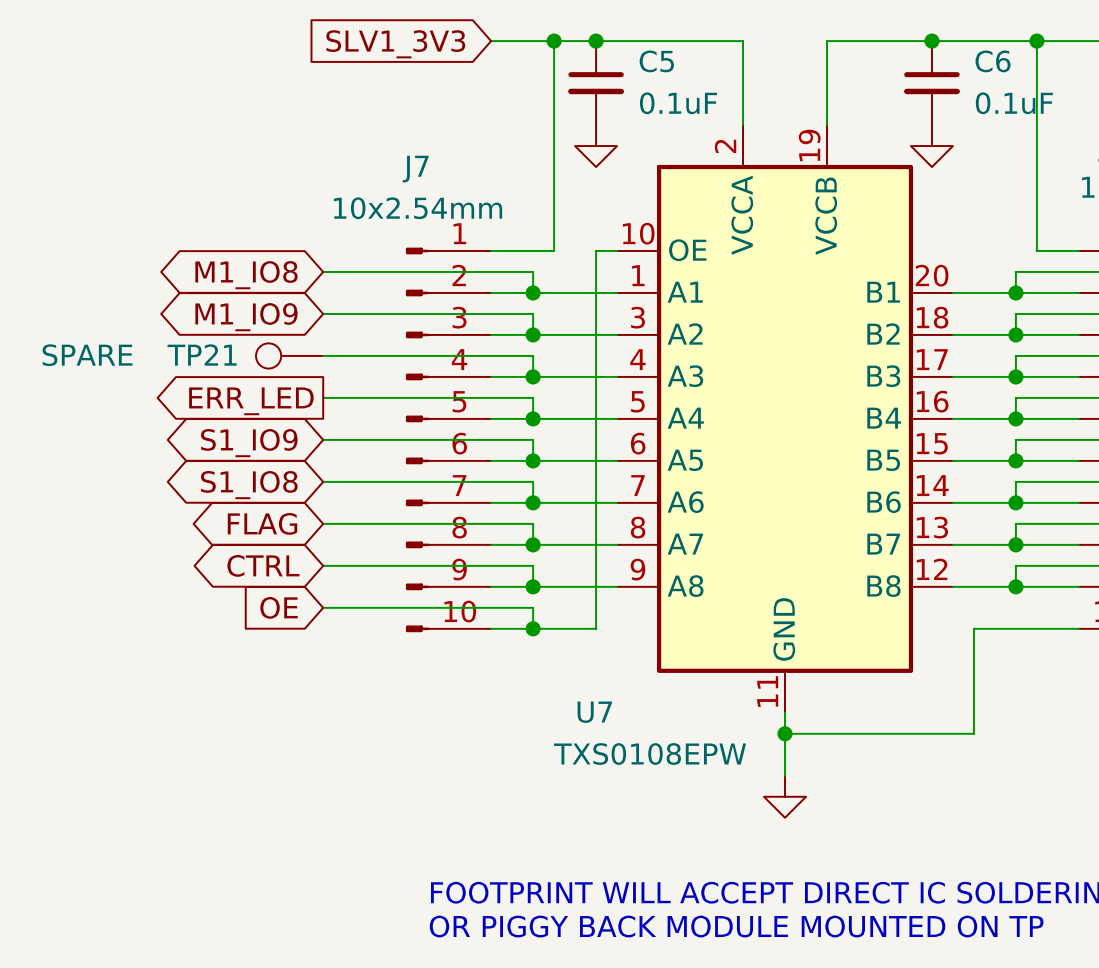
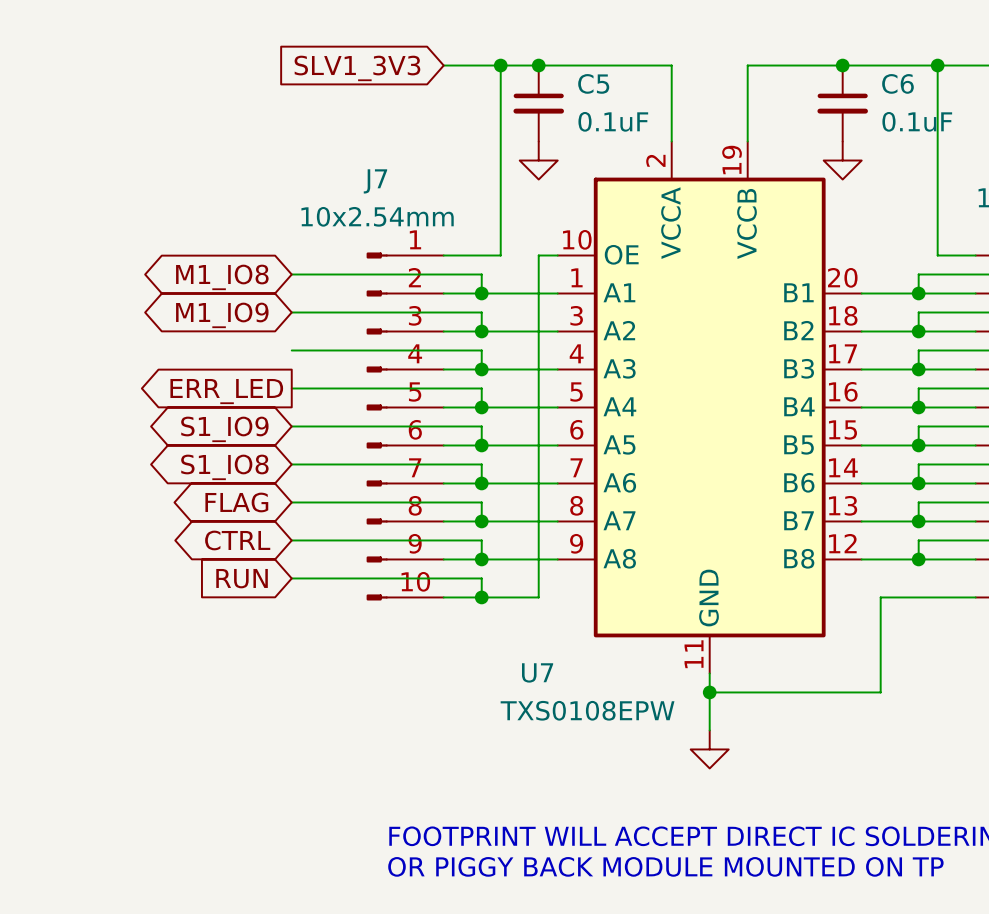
TP21: SPARE (289, 355) -> none
global label: OE (279, 607) -> RUN (242, 578)

